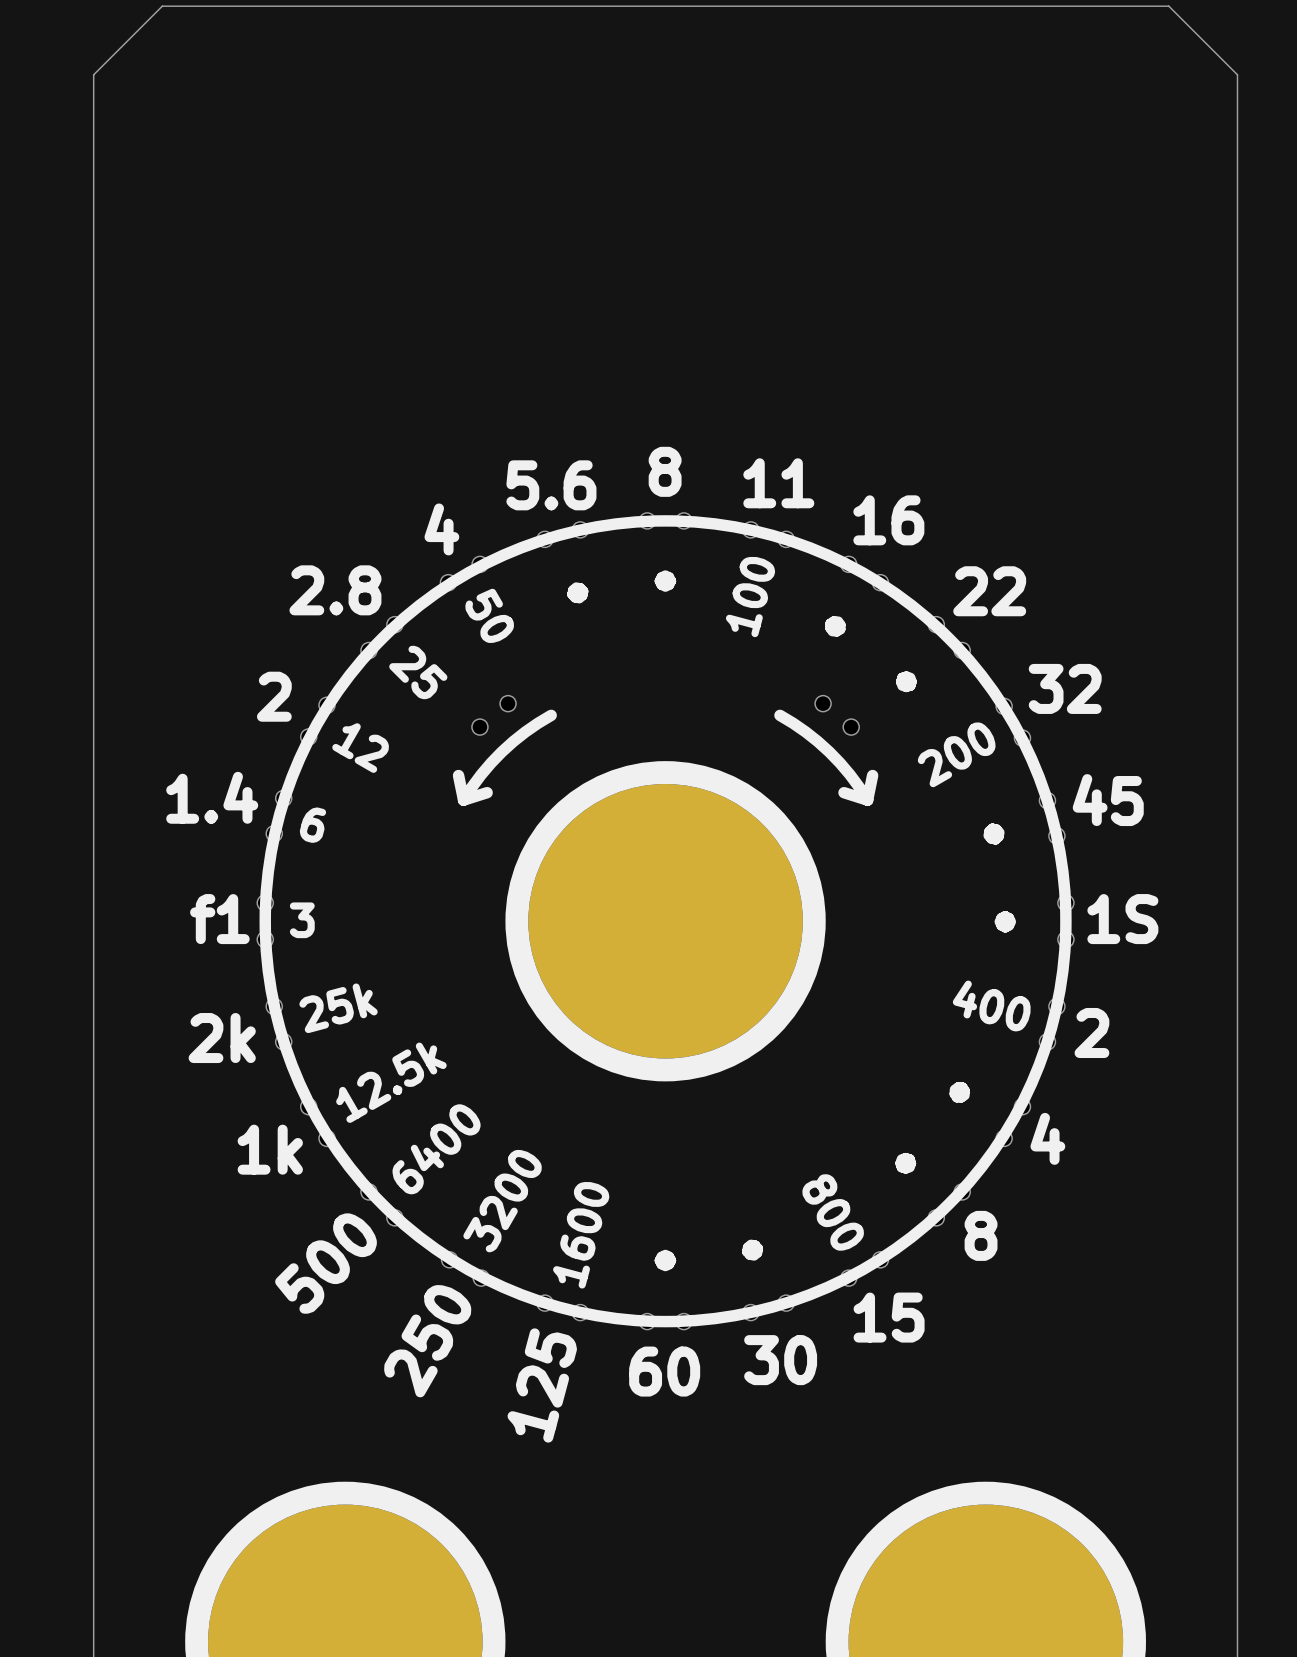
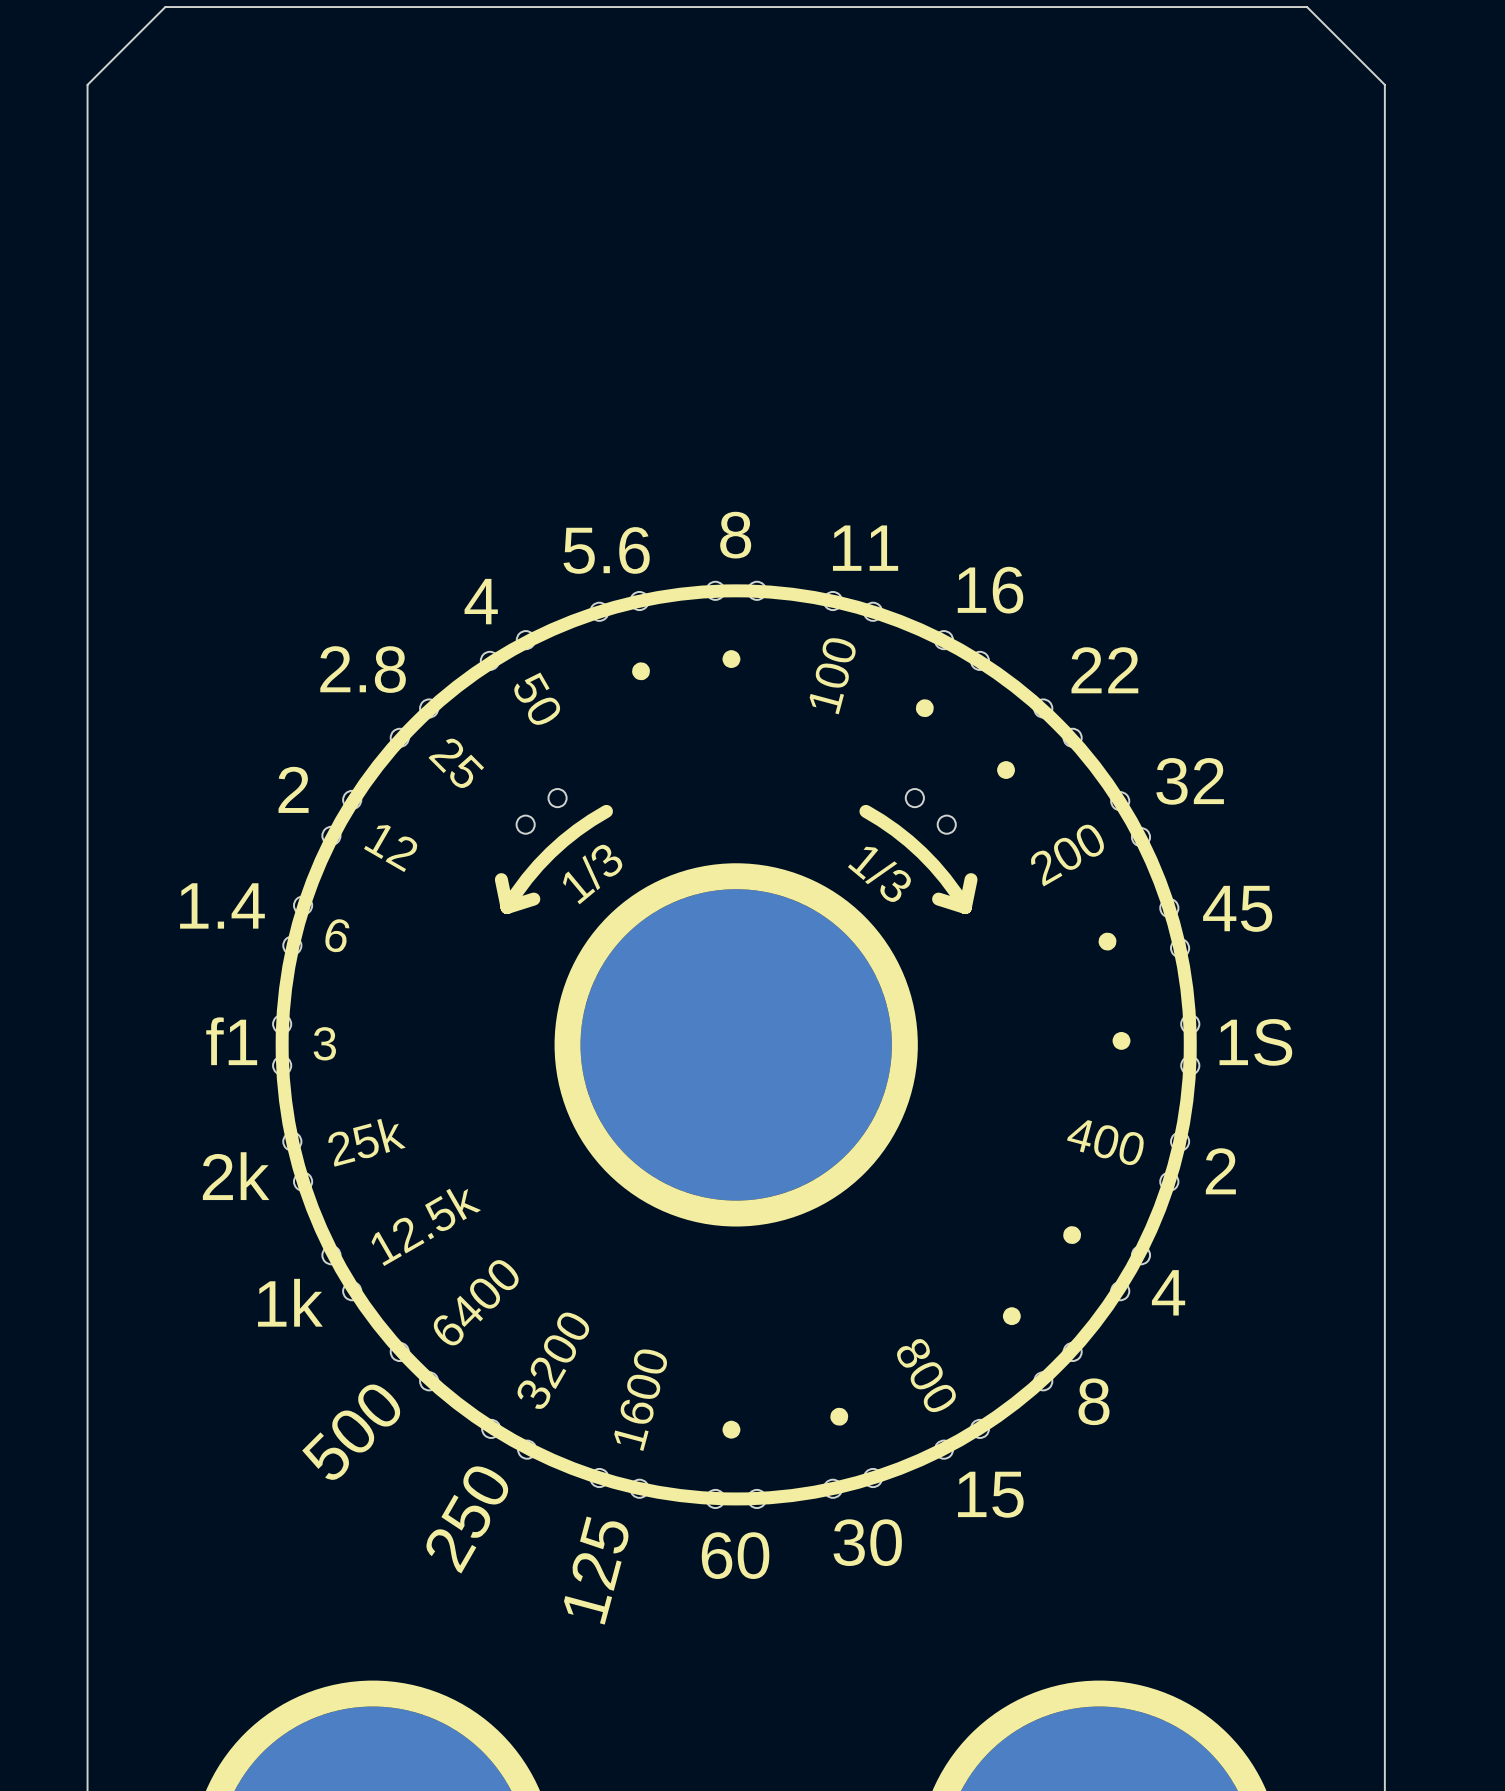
text: none -> 1/3 (592, 874)
text: none -> 1/3 (879, 874)

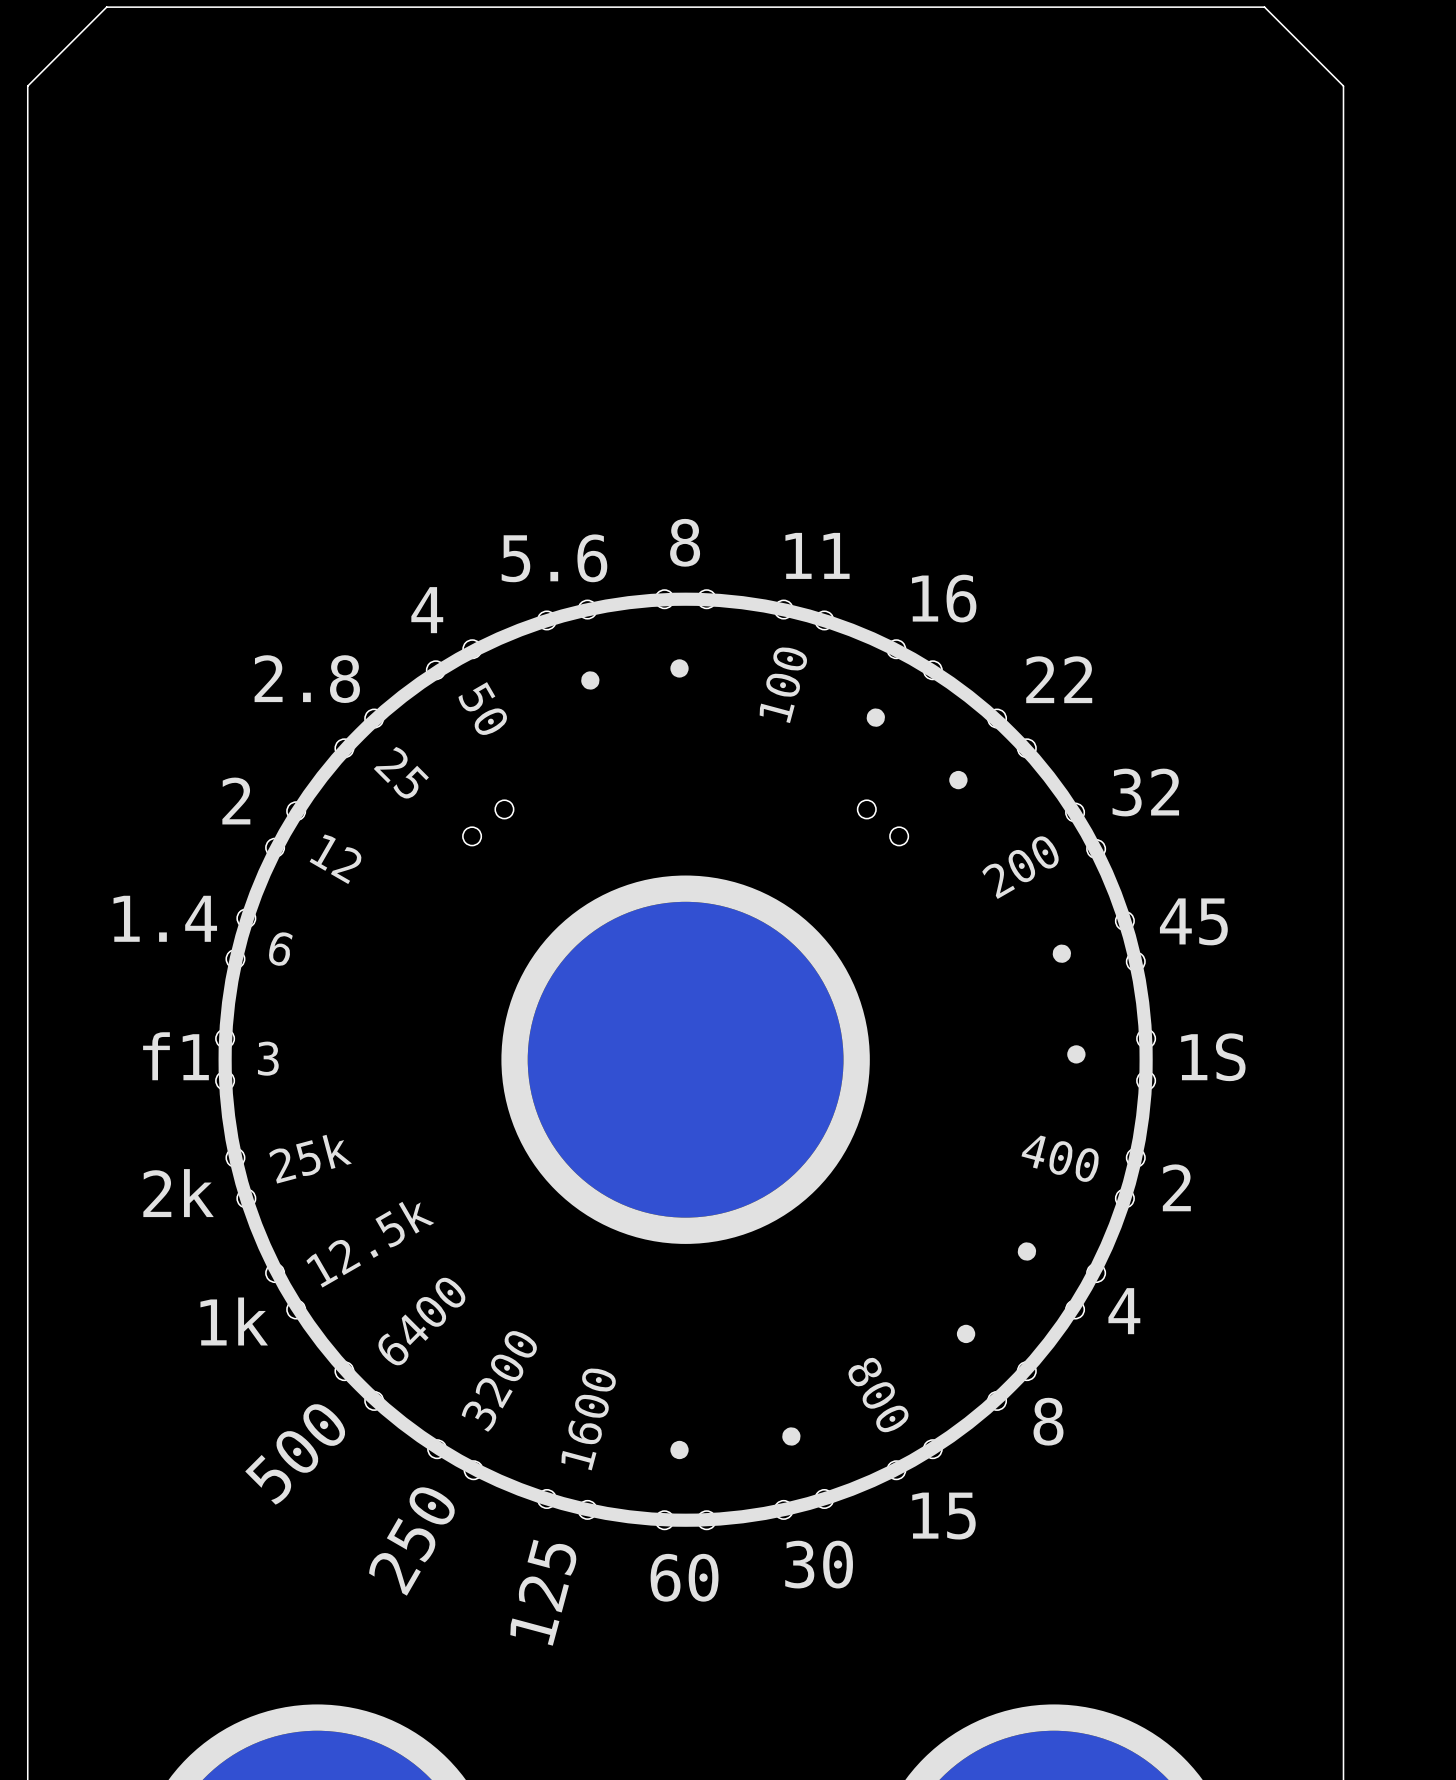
line: (606, 811) (577, 830) (550, 852) (526, 878) (507, 907) -> none
line: (865, 811) (895, 830) (921, 852) (945, 878) (965, 907) -> none
text: 1/3 (592, 874) -> none
text: 1/3 (879, 874) -> none
line: (501, 879) (507, 907) -> none
line: (971, 879) (965, 907) -> none
line: (533, 899) (507, 907) -> none
line: (938, 899) (965, 907) -> none

